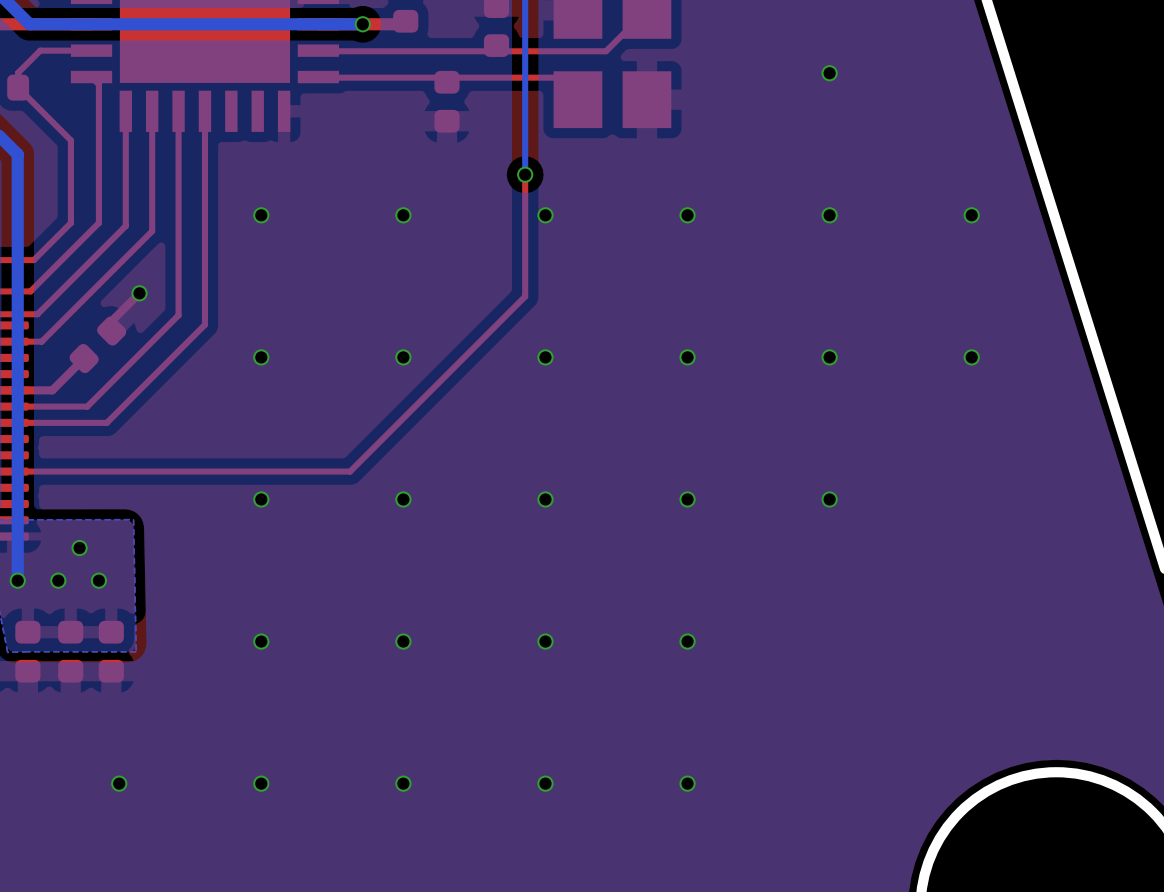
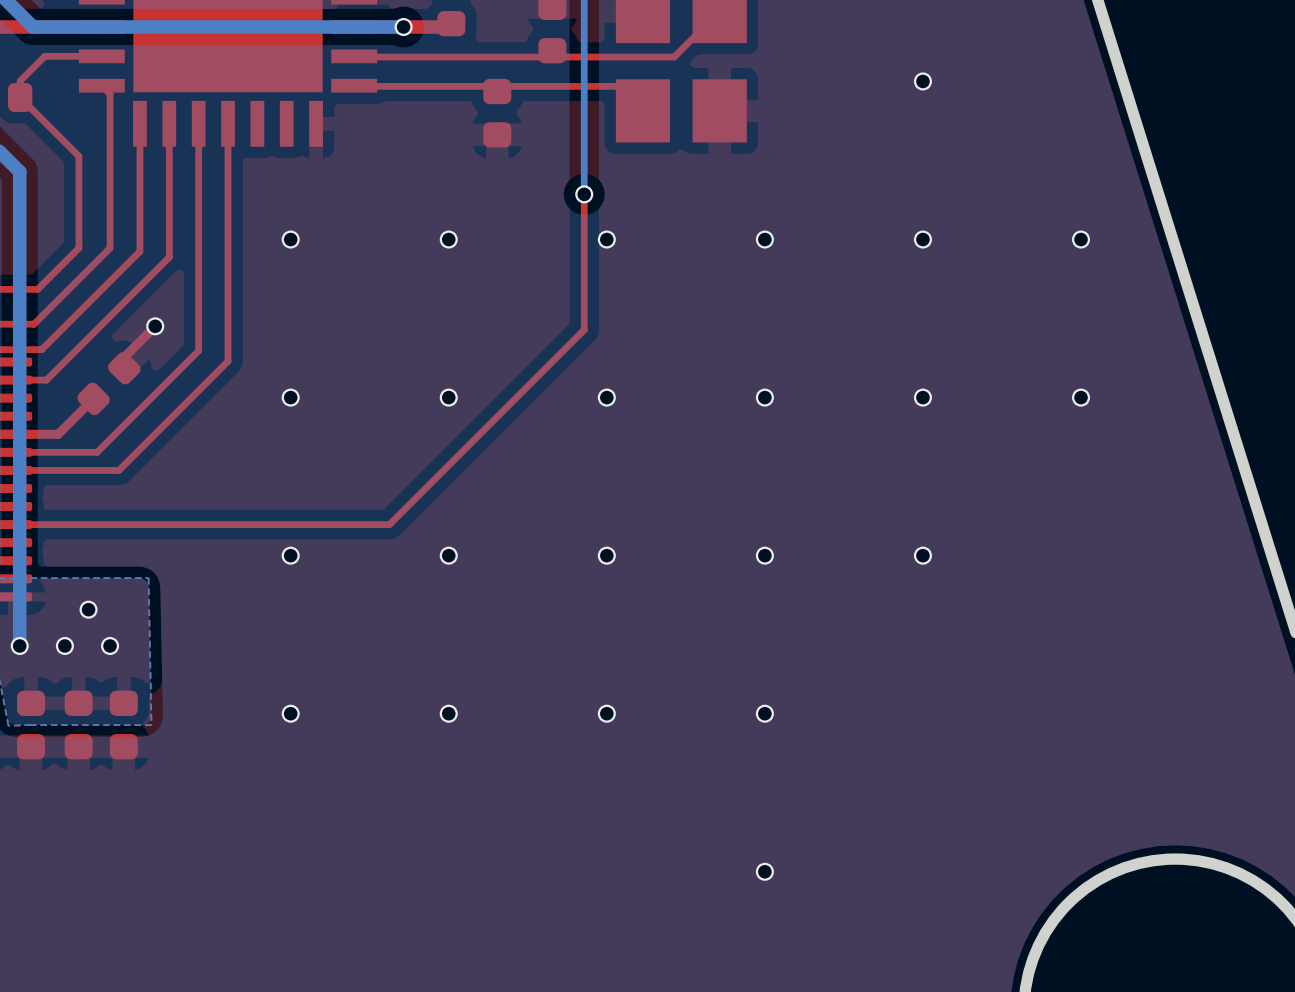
via: (119, 783) -> none
via: (261, 783) -> none
via: (403, 783) -> none
via: (545, 783) -> none

